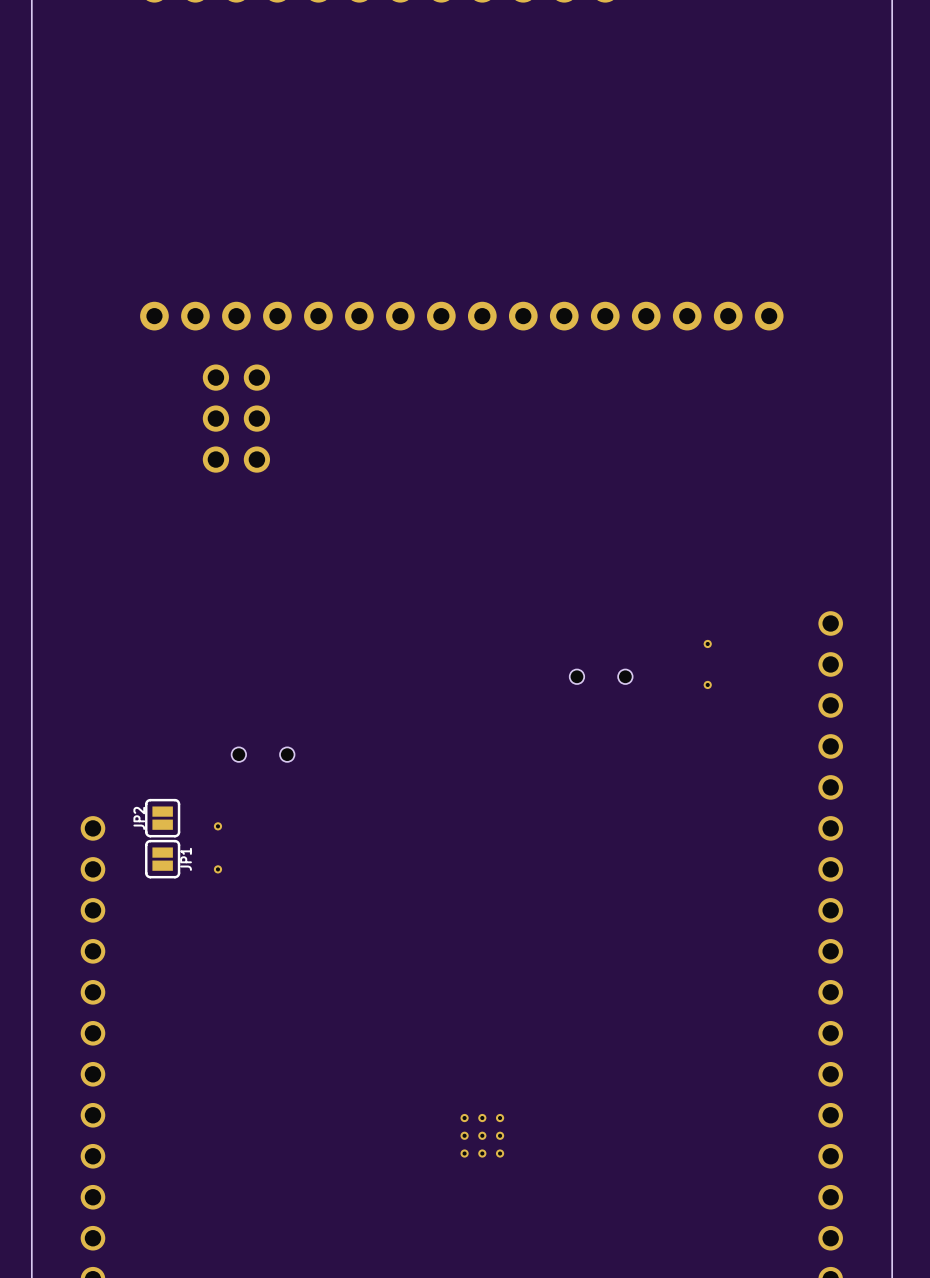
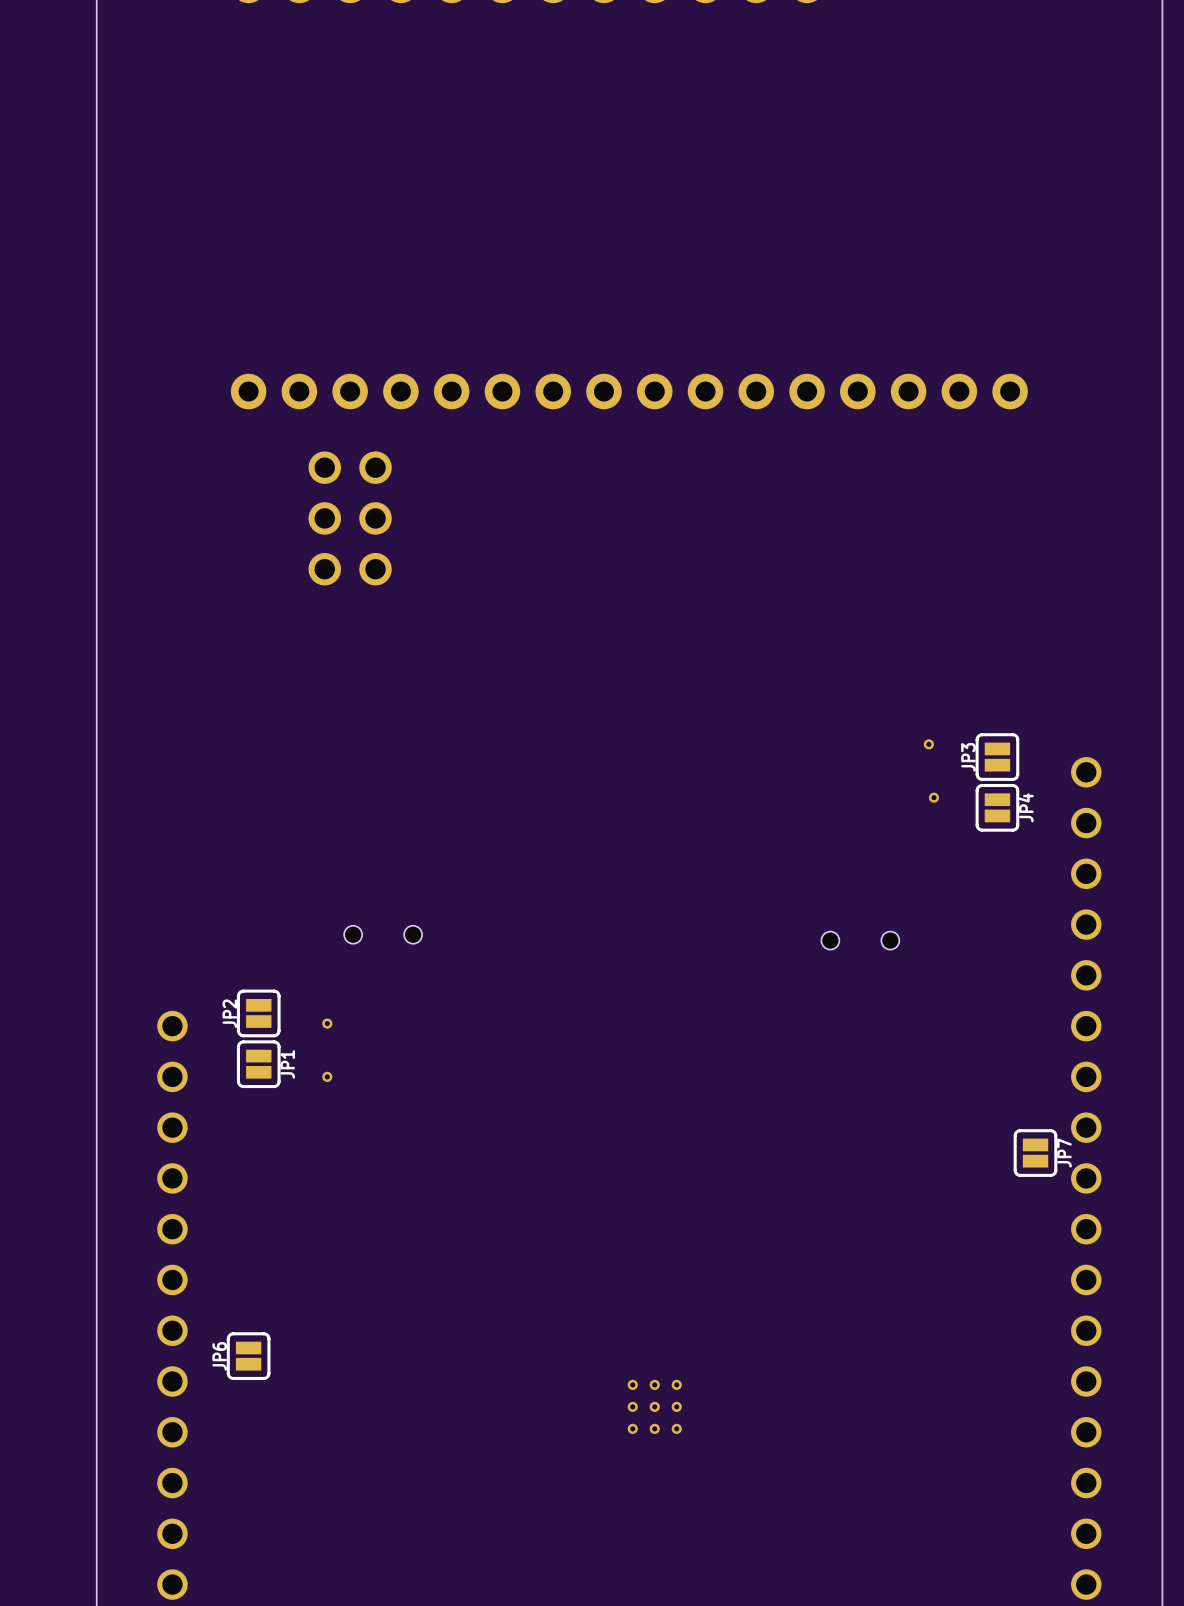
JP3: none -> (997, 757)
JP4: none -> (997, 807)
part position: (601, 676) -> (860, 940)
part position: (707, 684) -> (928, 744)
JP7: none -> (1035, 1153)
JP6: none -> (248, 1356)

